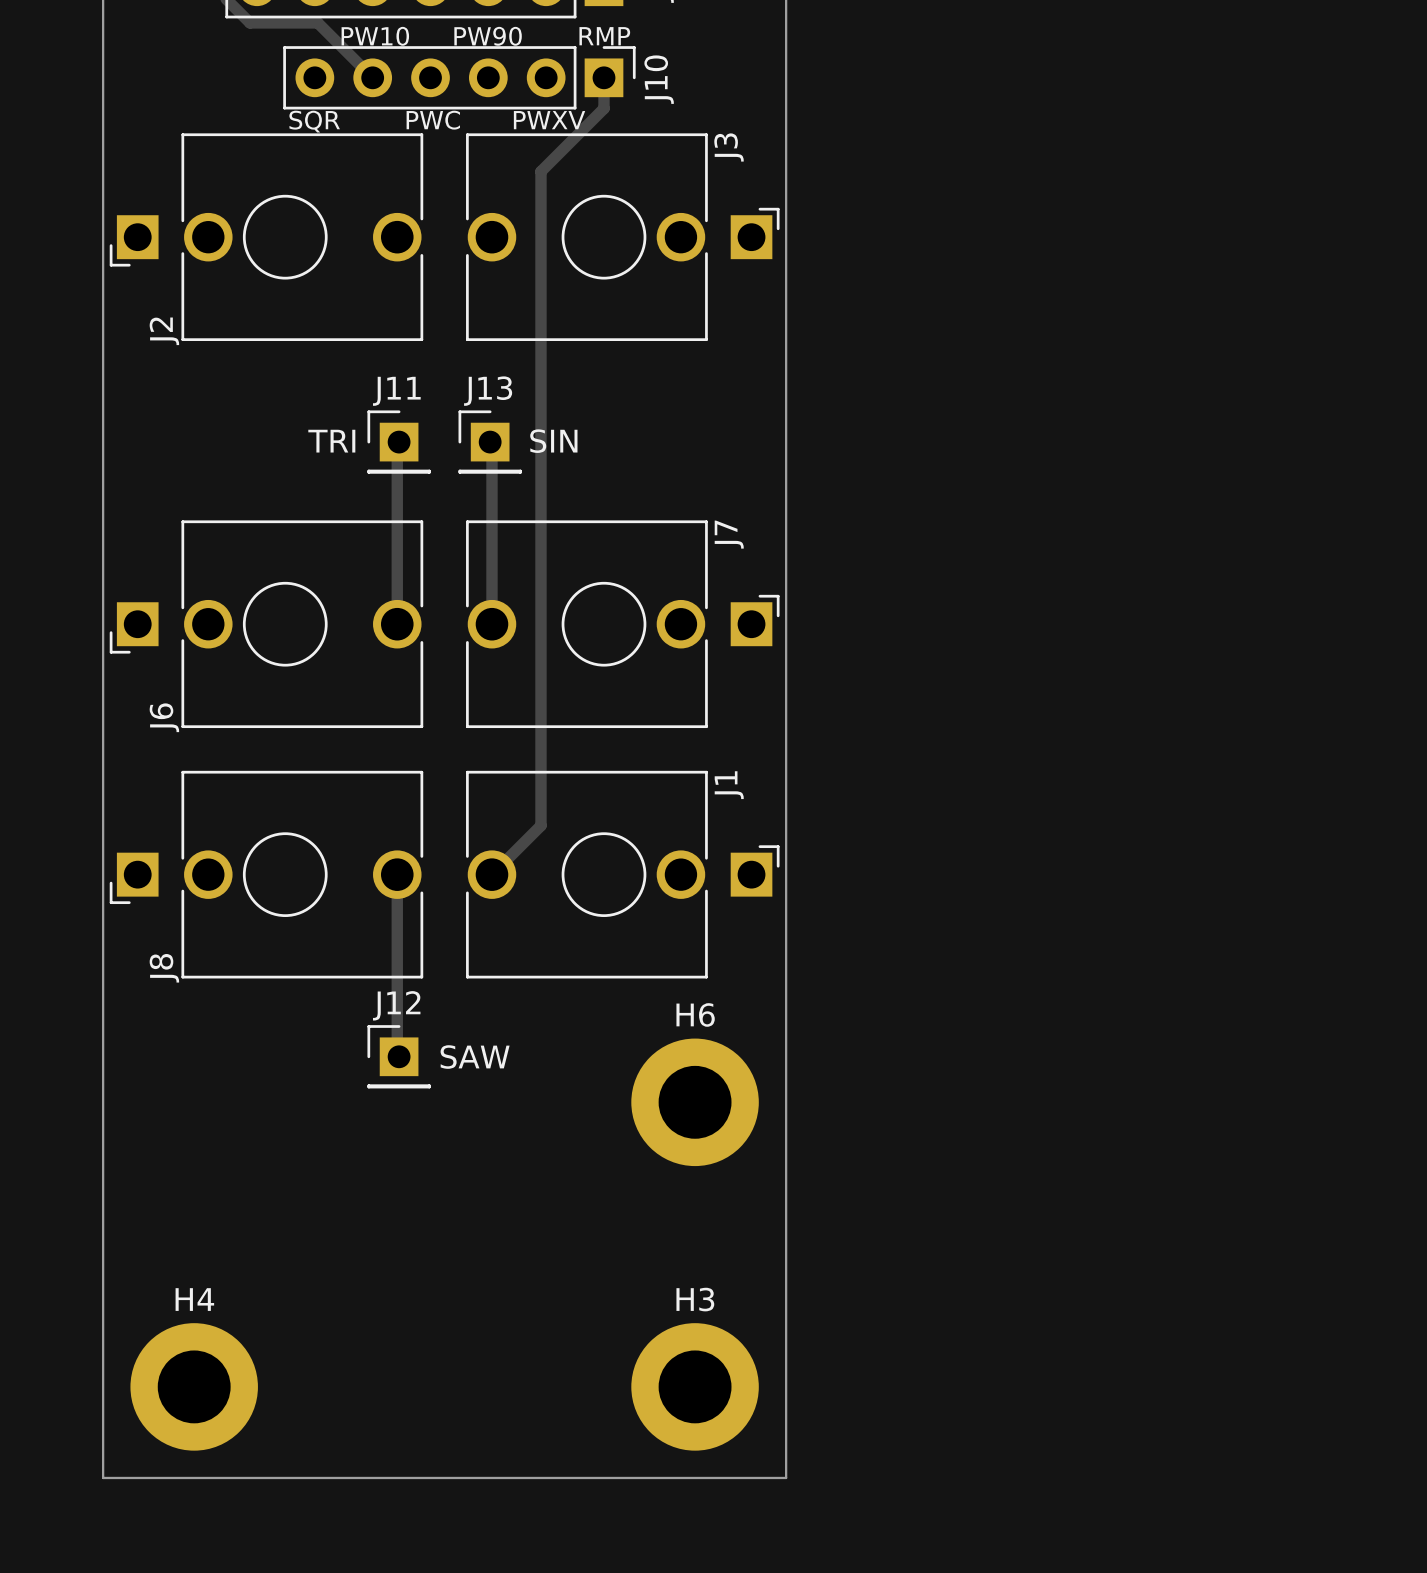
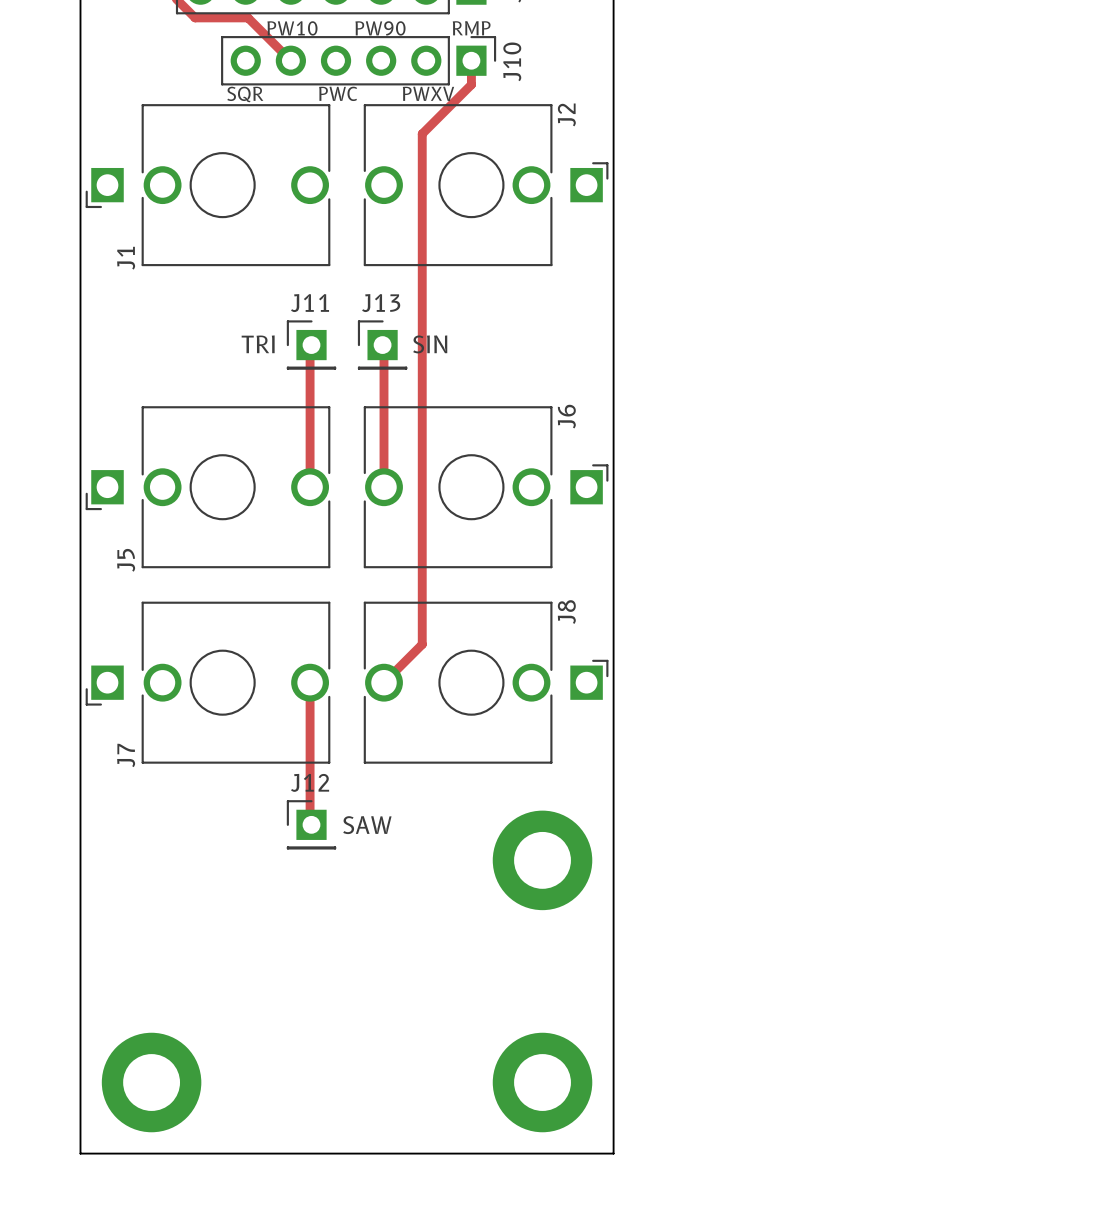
J3 name: J3 (729, 147) -> J2 (566, 114)
J2 name: J2 (164, 331) -> J1 (126, 258)
J7 name: J7 (729, 534) -> J6 (566, 416)
J6 name: J6 (164, 717) -> J5 (126, 560)
J1 name: J1 (729, 785) -> J8 (566, 612)
J8 name: J8 (164, 968) -> J7 (126, 755)
H6 name: H6 (695, 1014) -> none
H4 name: H4 (194, 1299) -> none
H3 name: H3 (695, 1299) -> none

